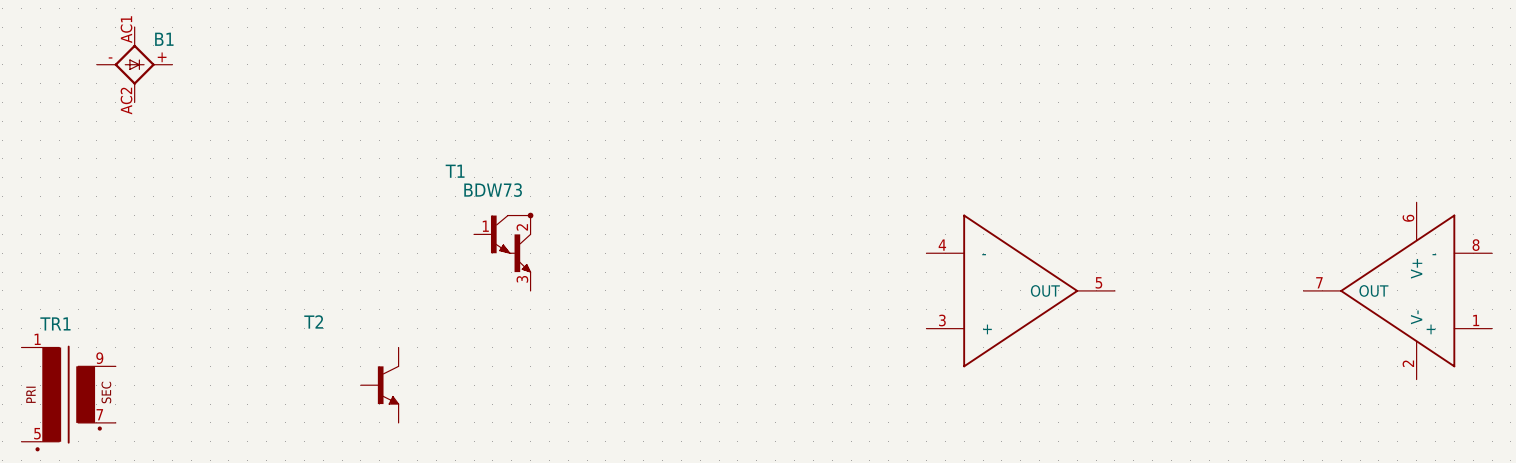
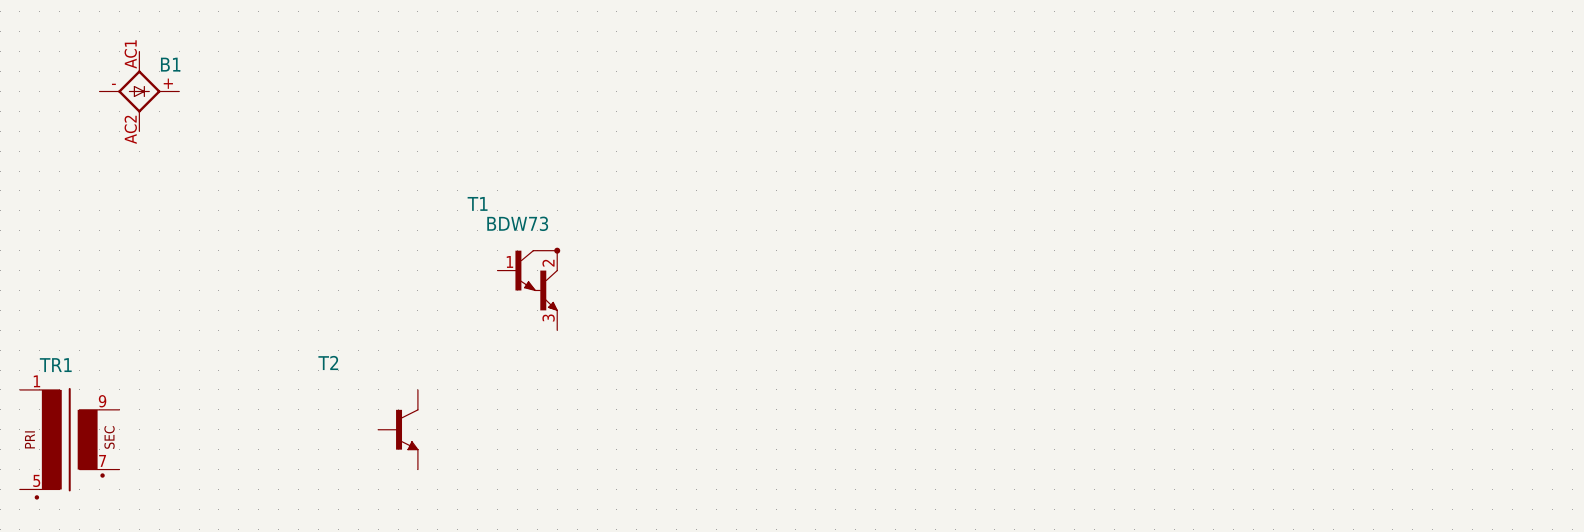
part: (1020, 290) -> none
part: (1397, 290) -> none

